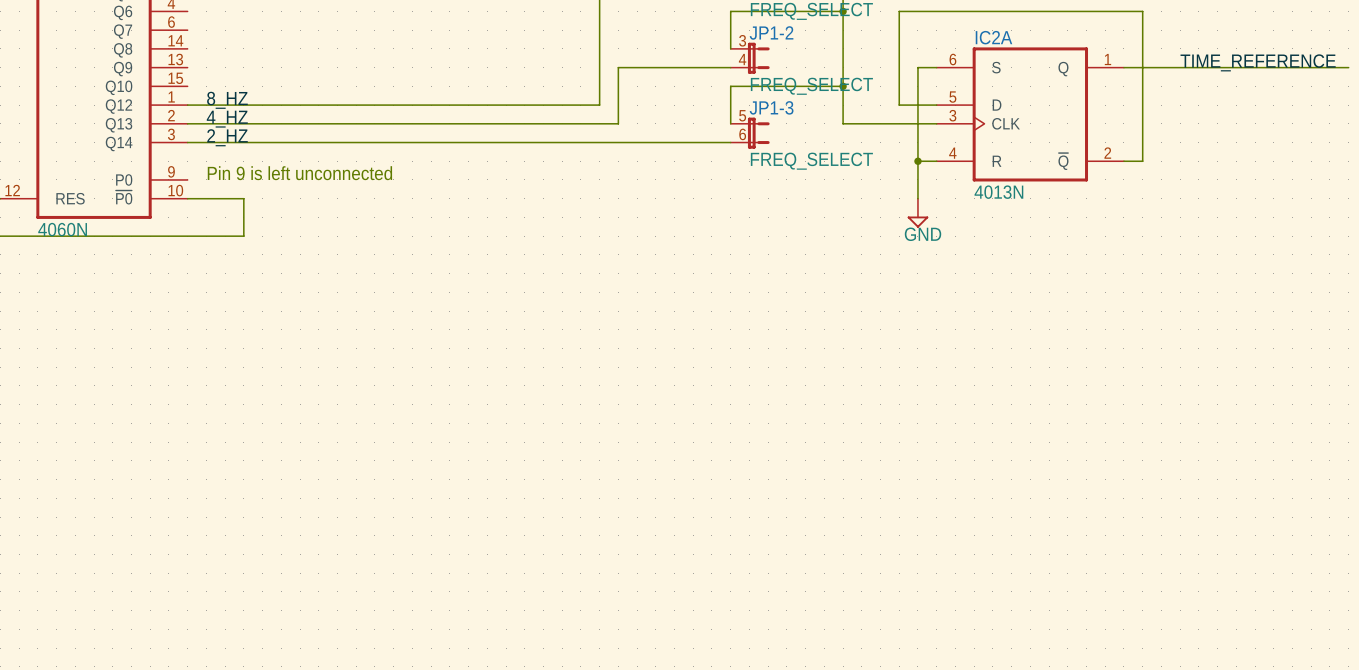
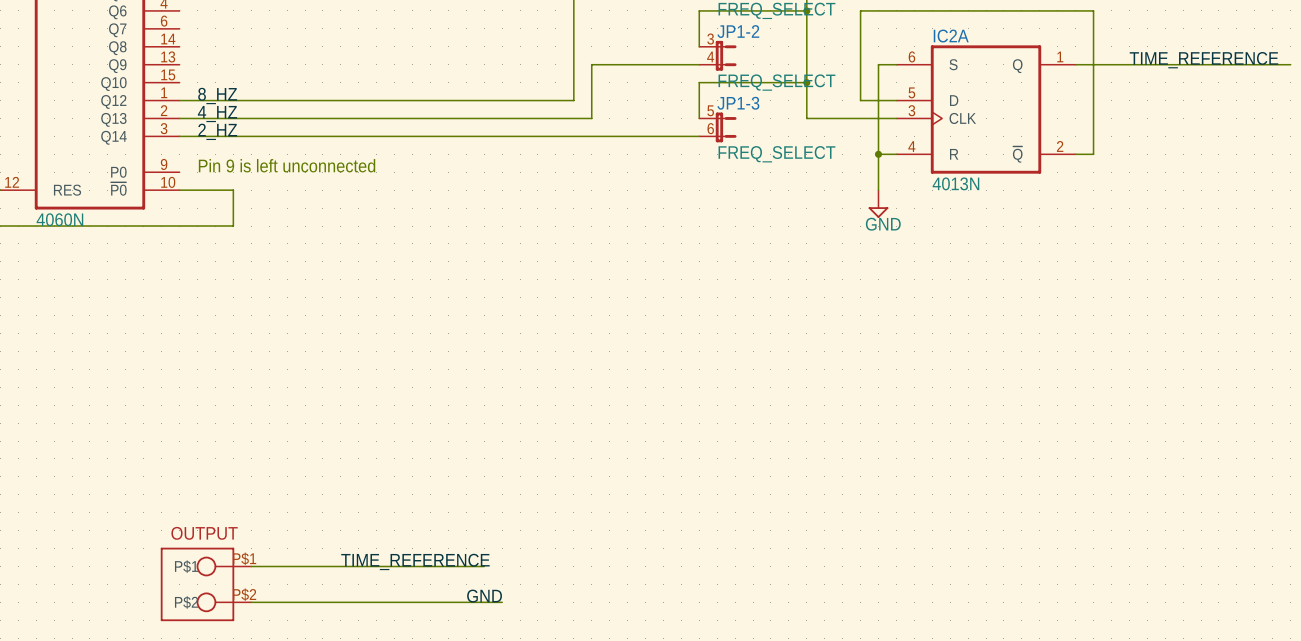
label: none -> TIME_REFERENCE (415, 561)
wire: none -> (251, 566) (484, 566)
OUTPUT: none -> (206, 584)
label: none -> GND (484, 596)
wire: none -> (251, 602) (502, 602)

